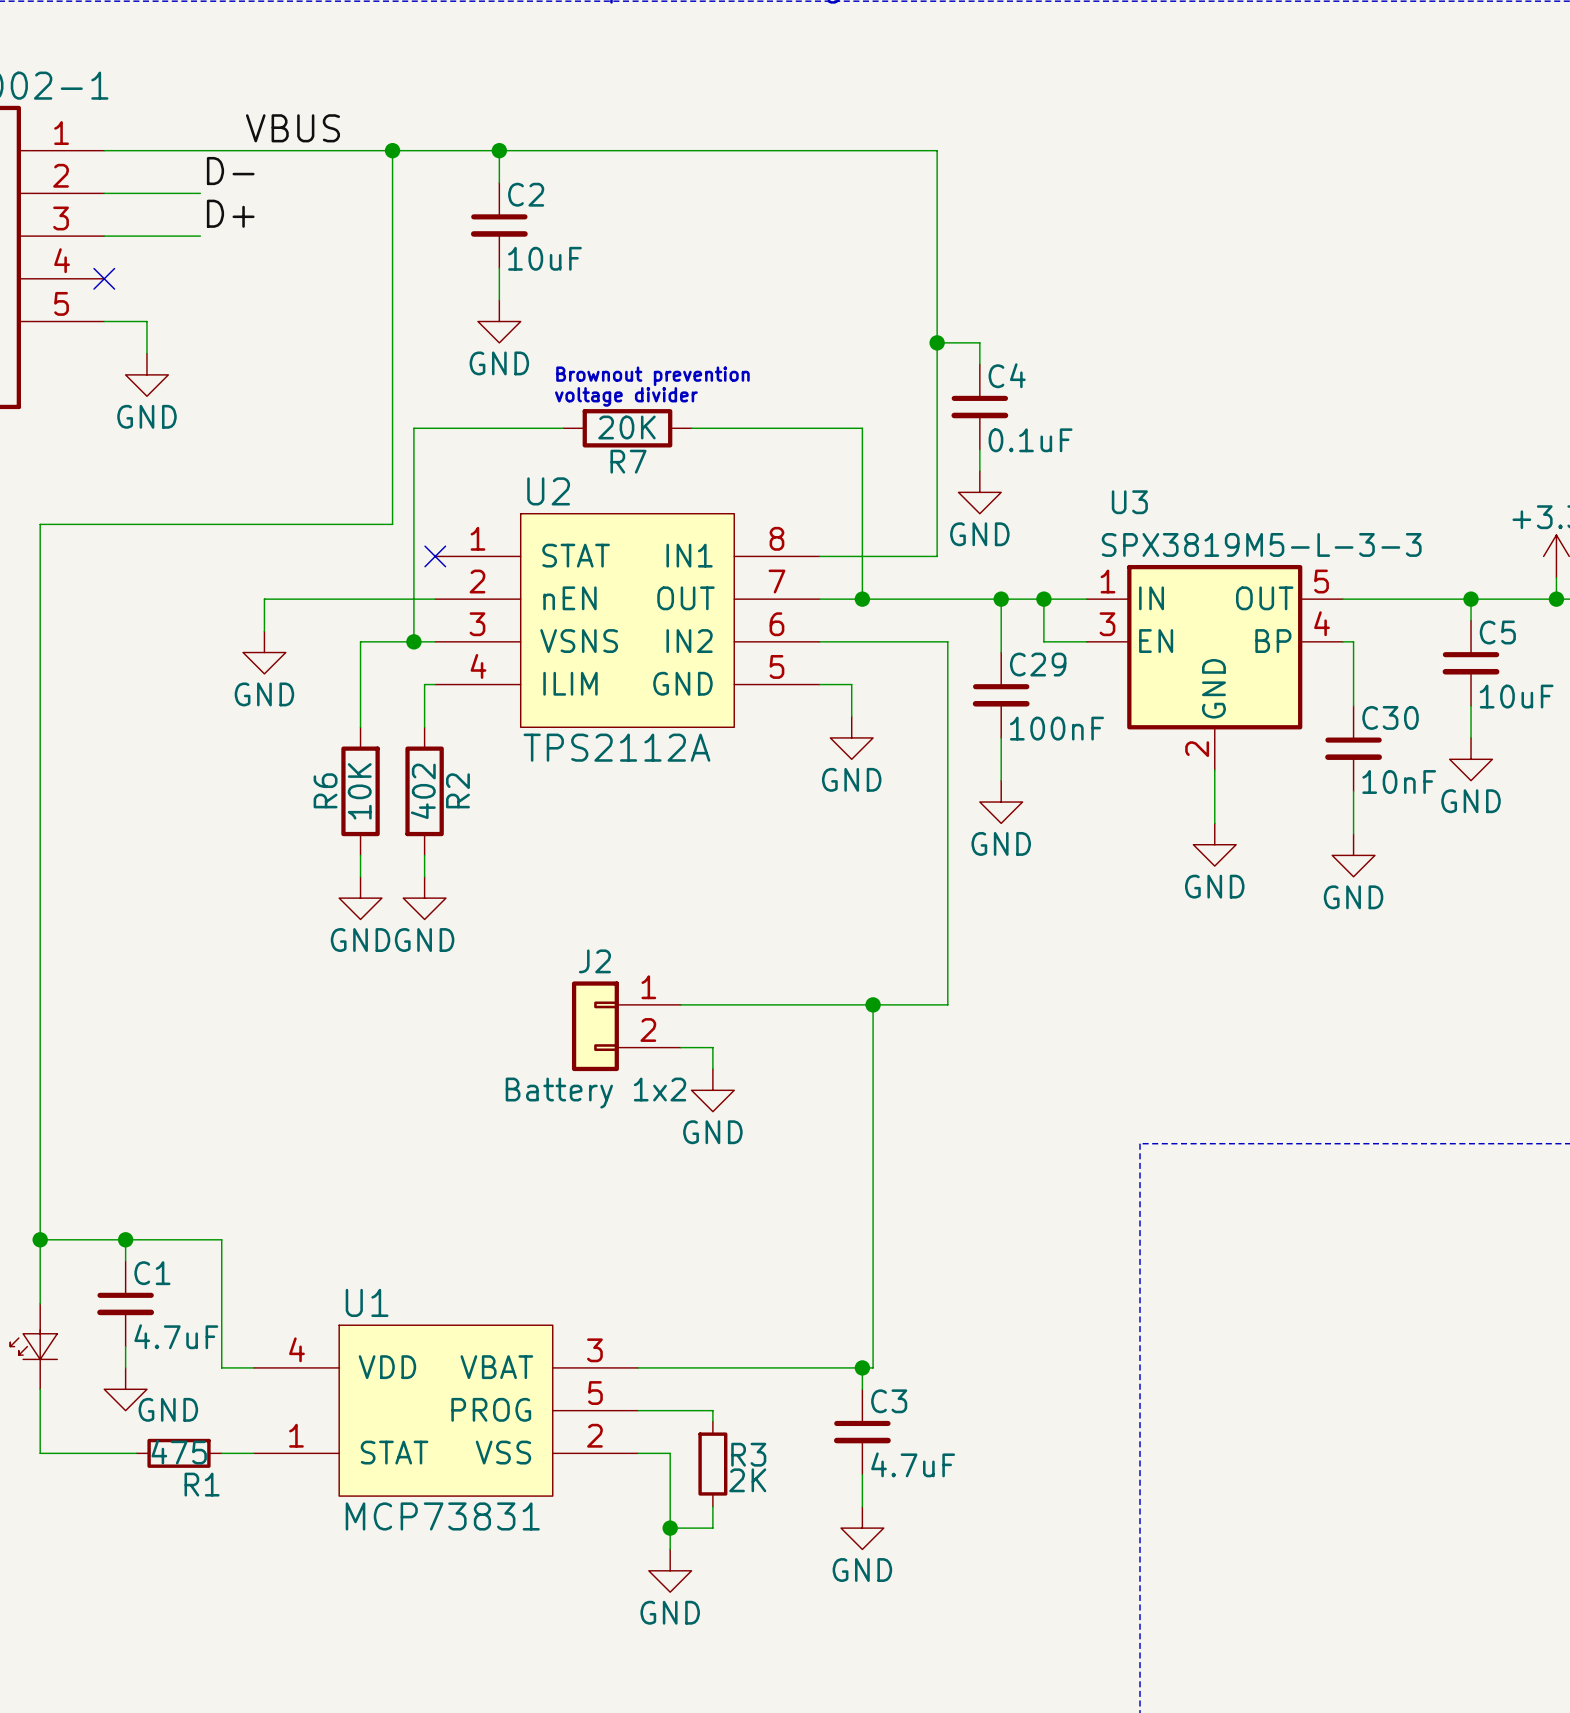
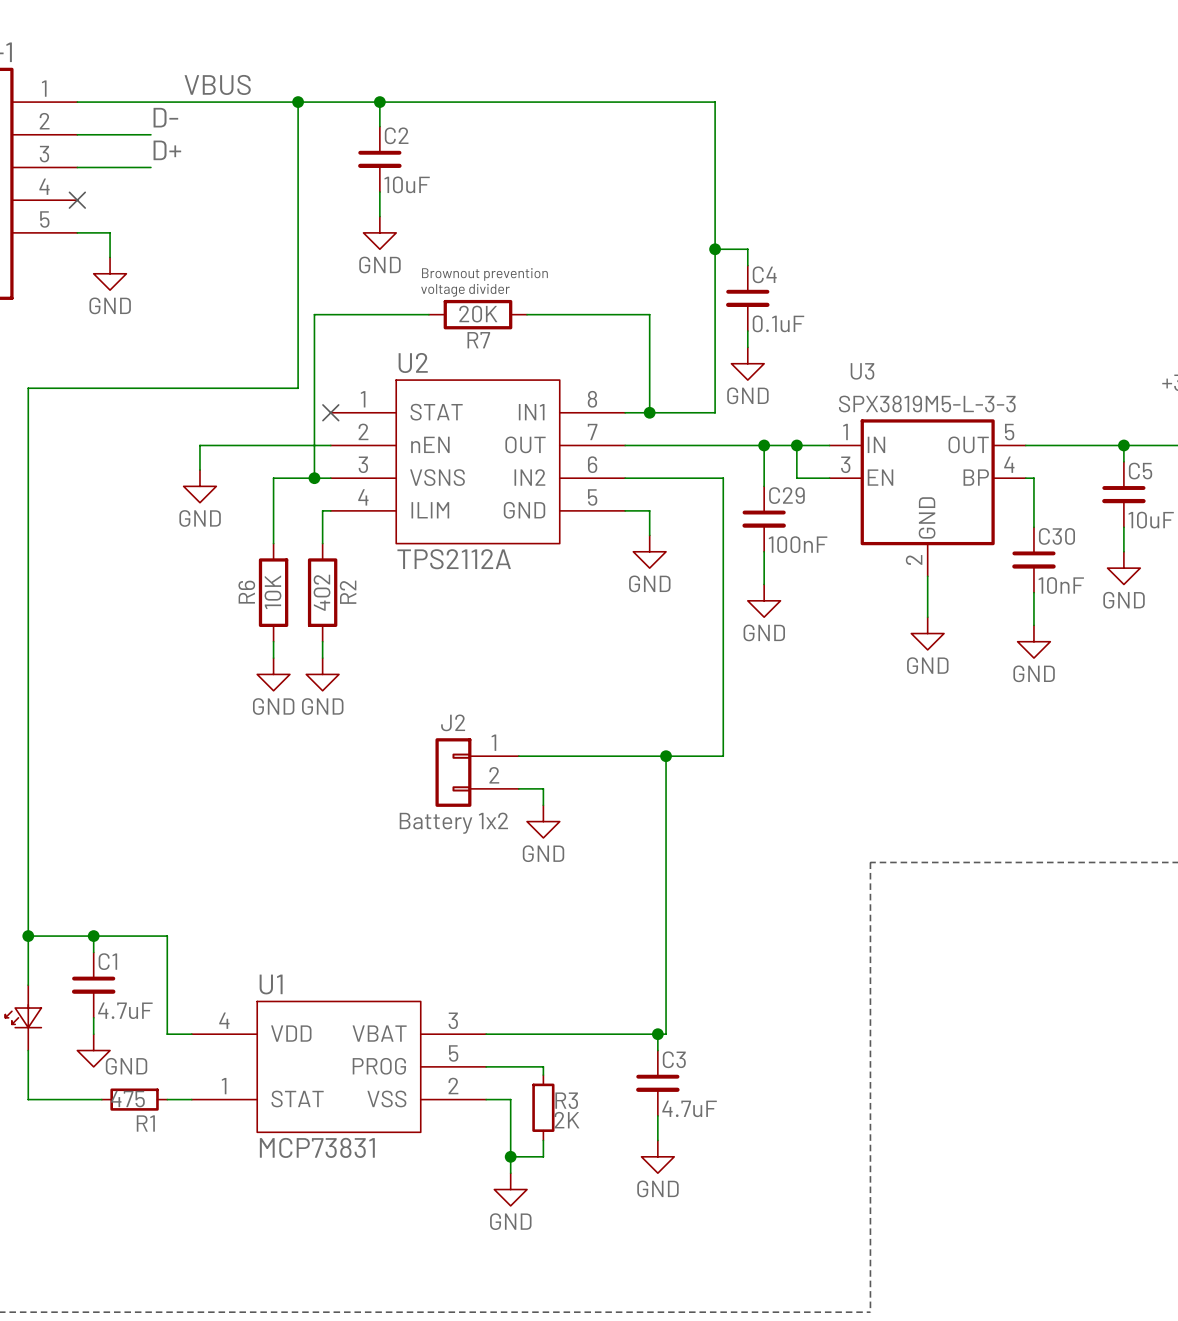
wire: (851, 428) (862, 428) (862, 599) -> (649, 314) (649, 412)
junction position: (862, 599) -> (649, 412)

